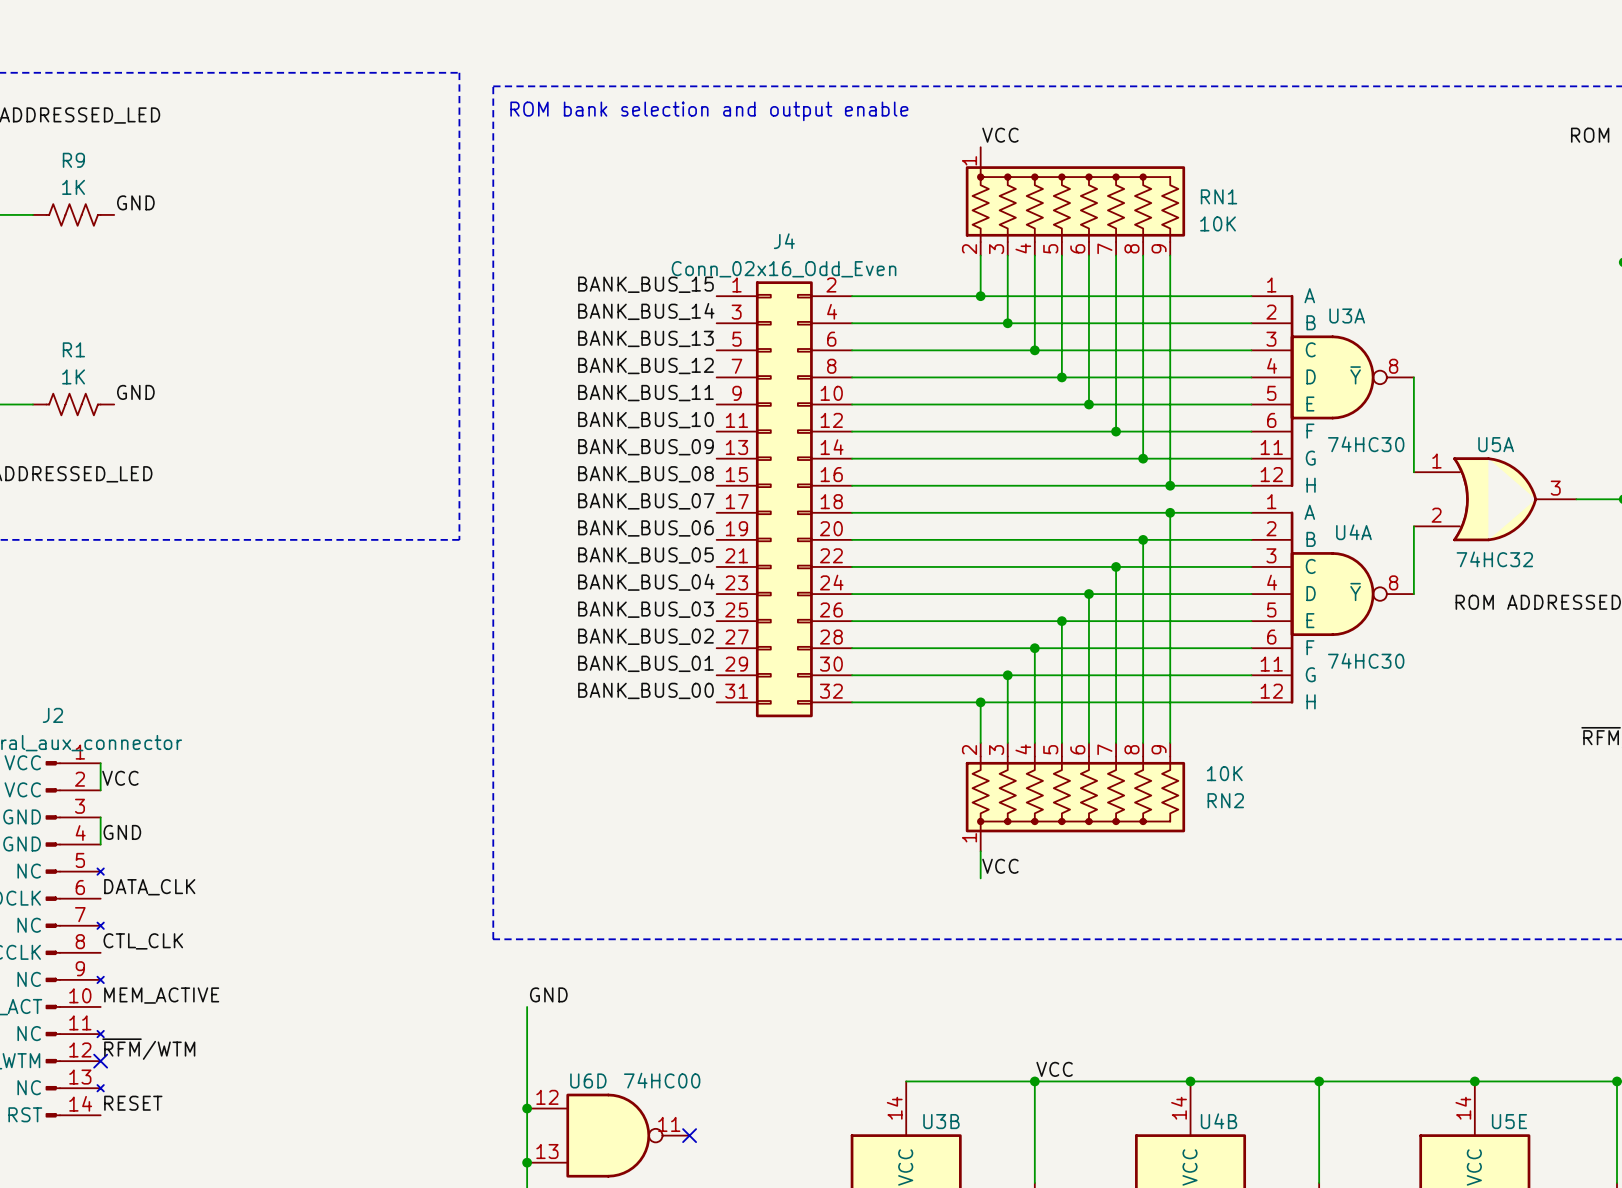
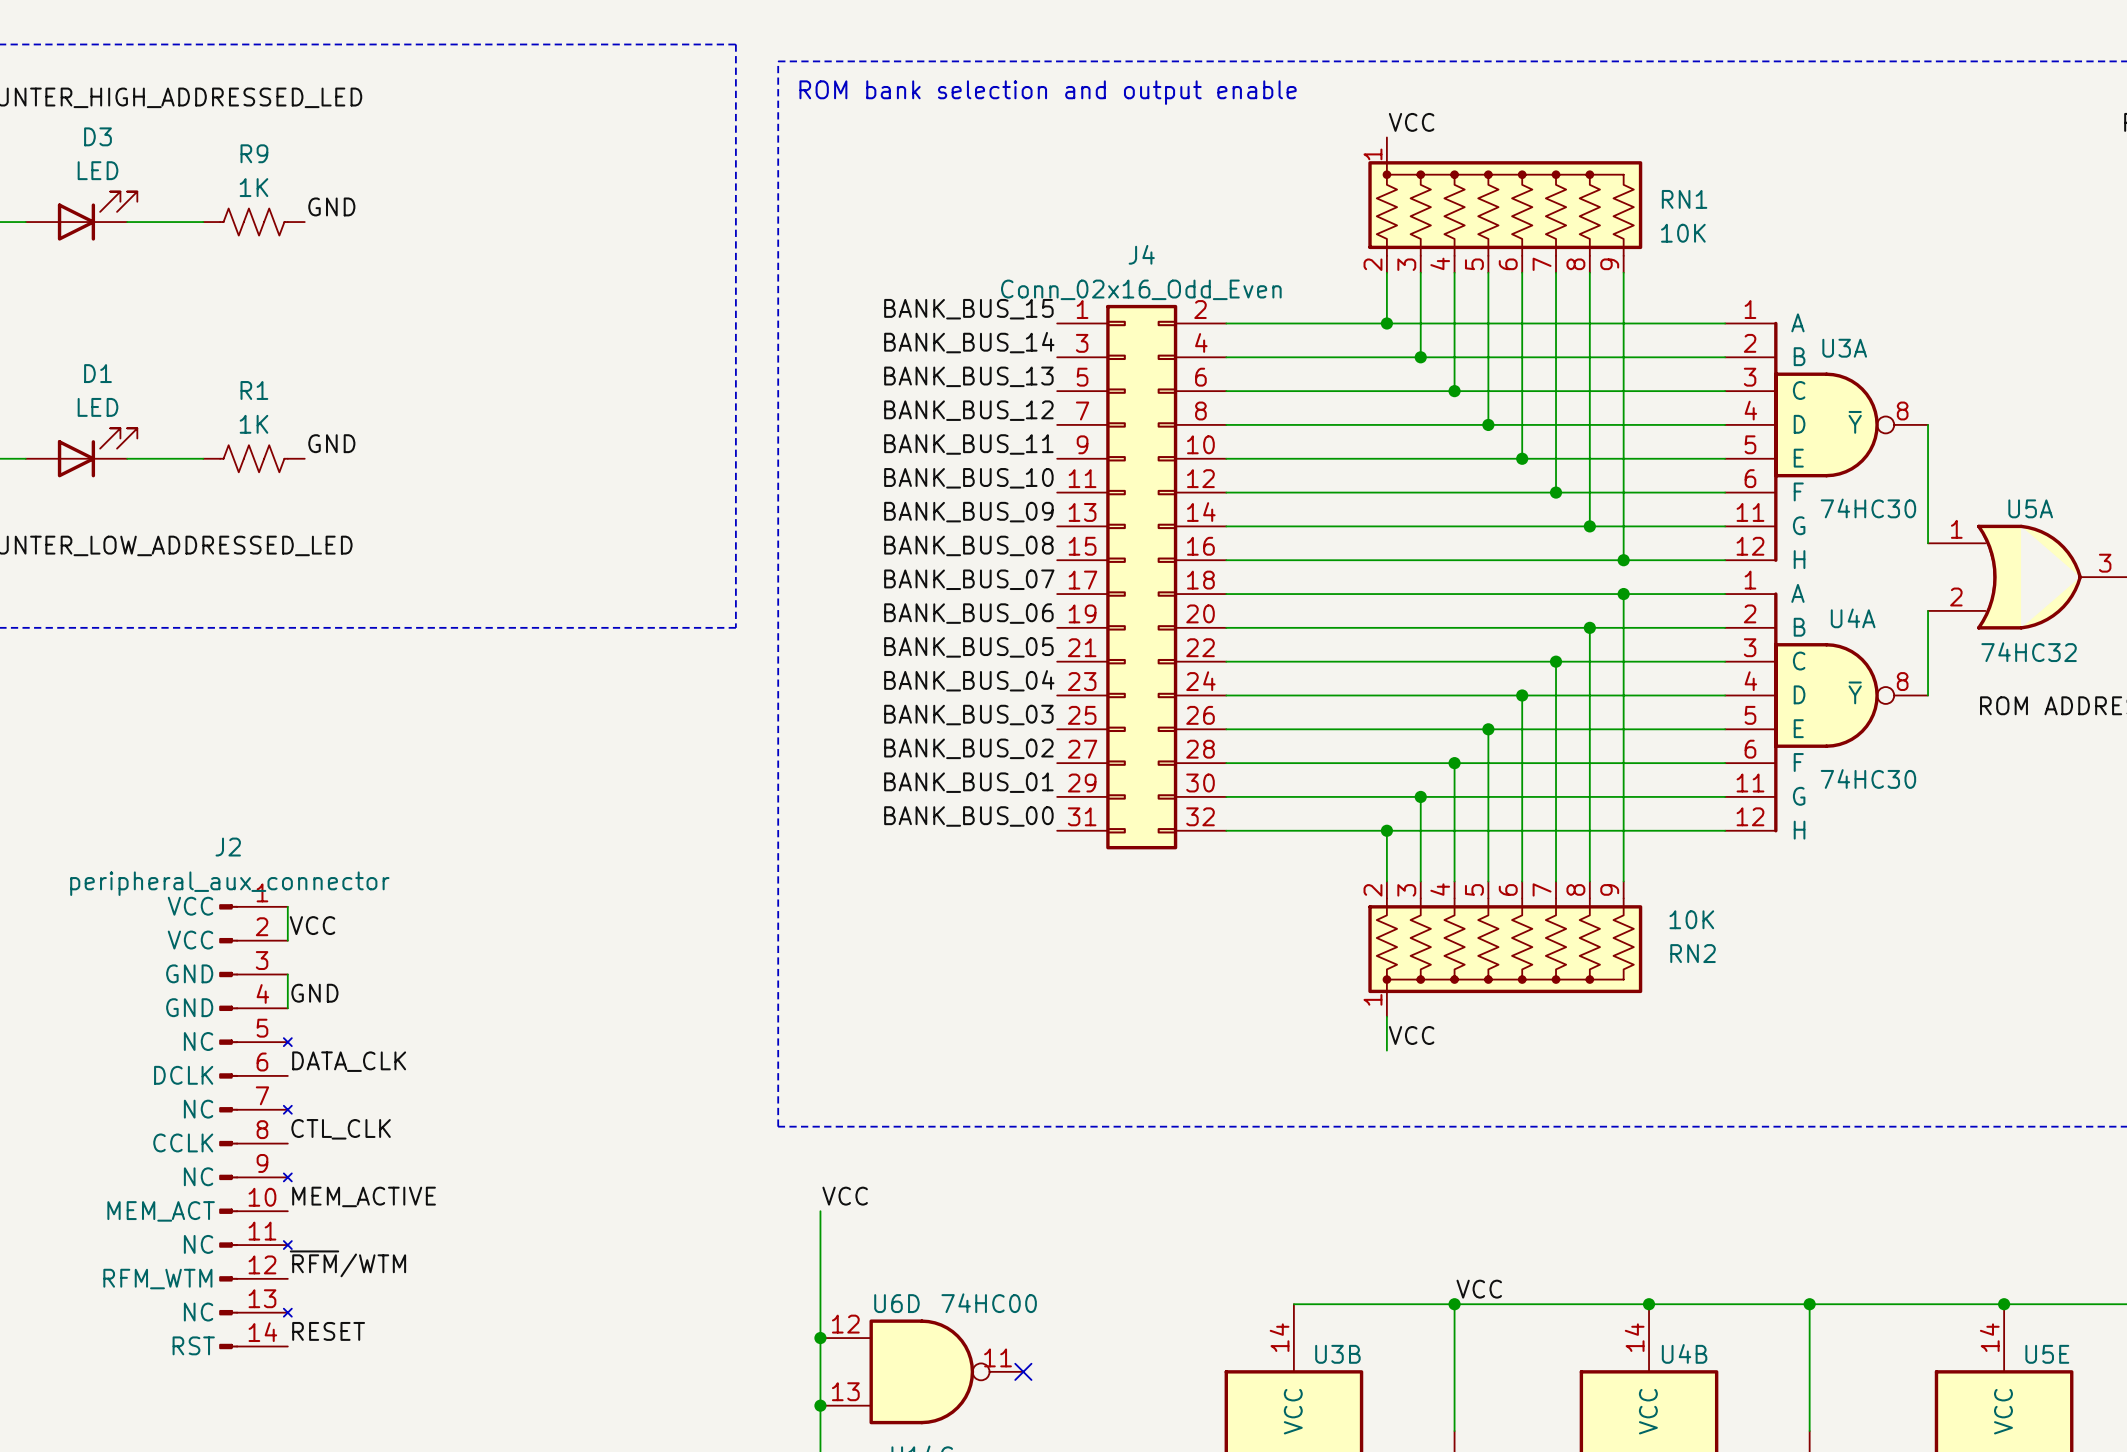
label: GND (548, 994) -> VCC (845, 1196)
no-connect mark: (100, 1061) -> none

